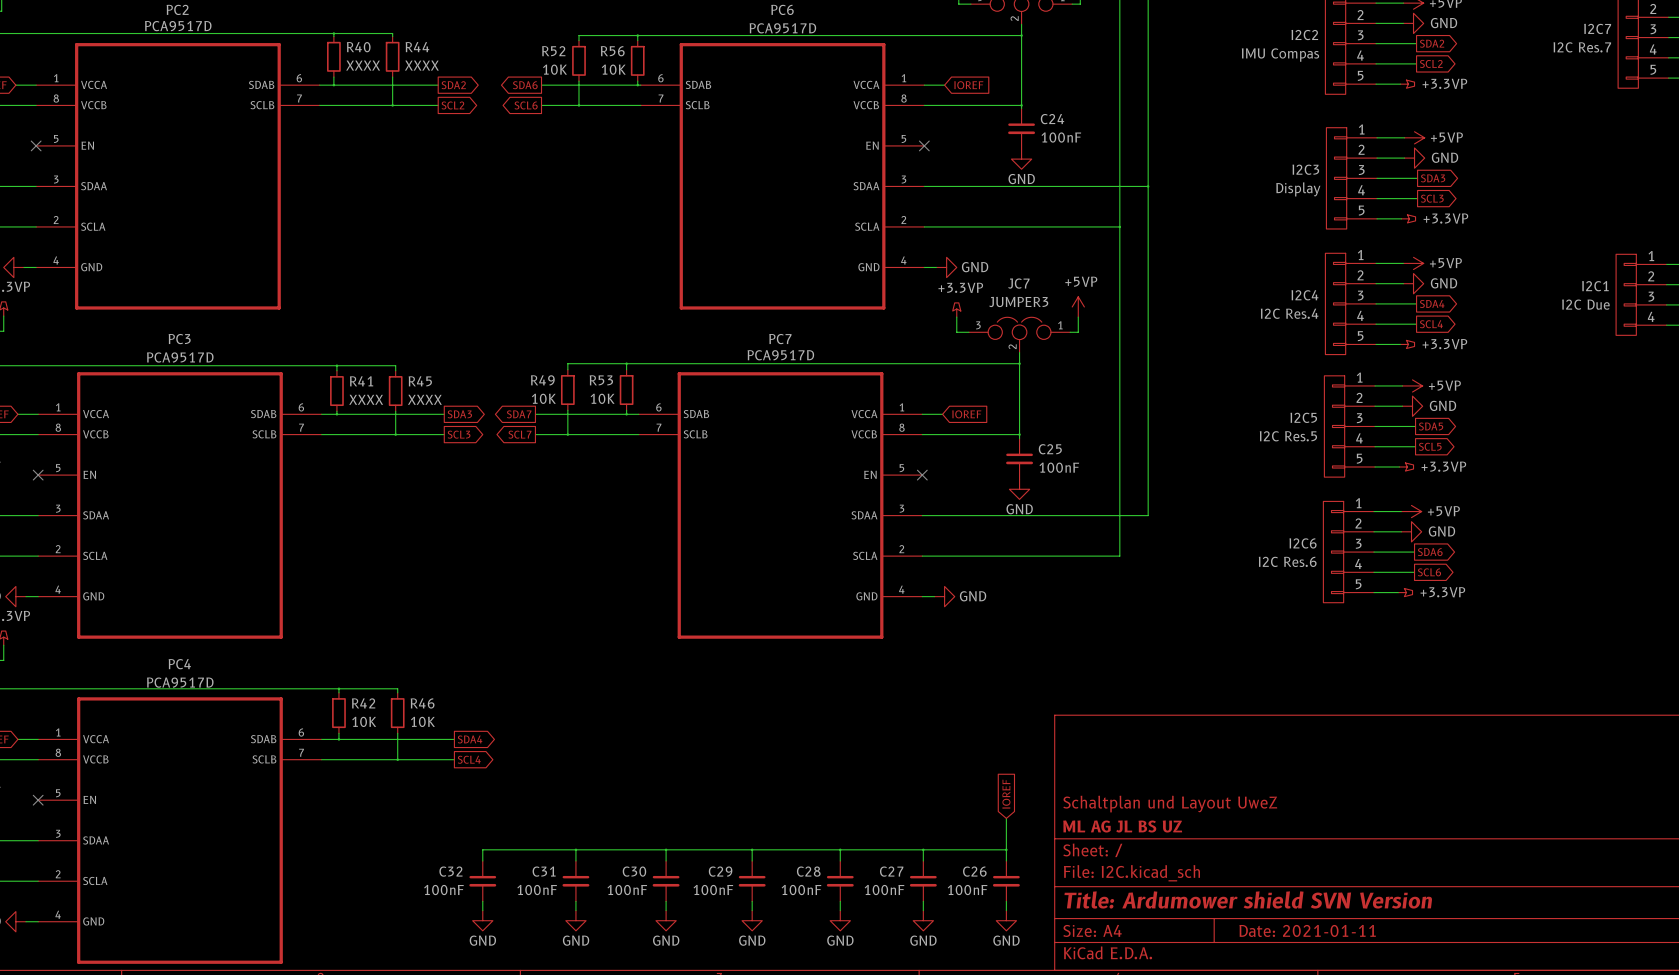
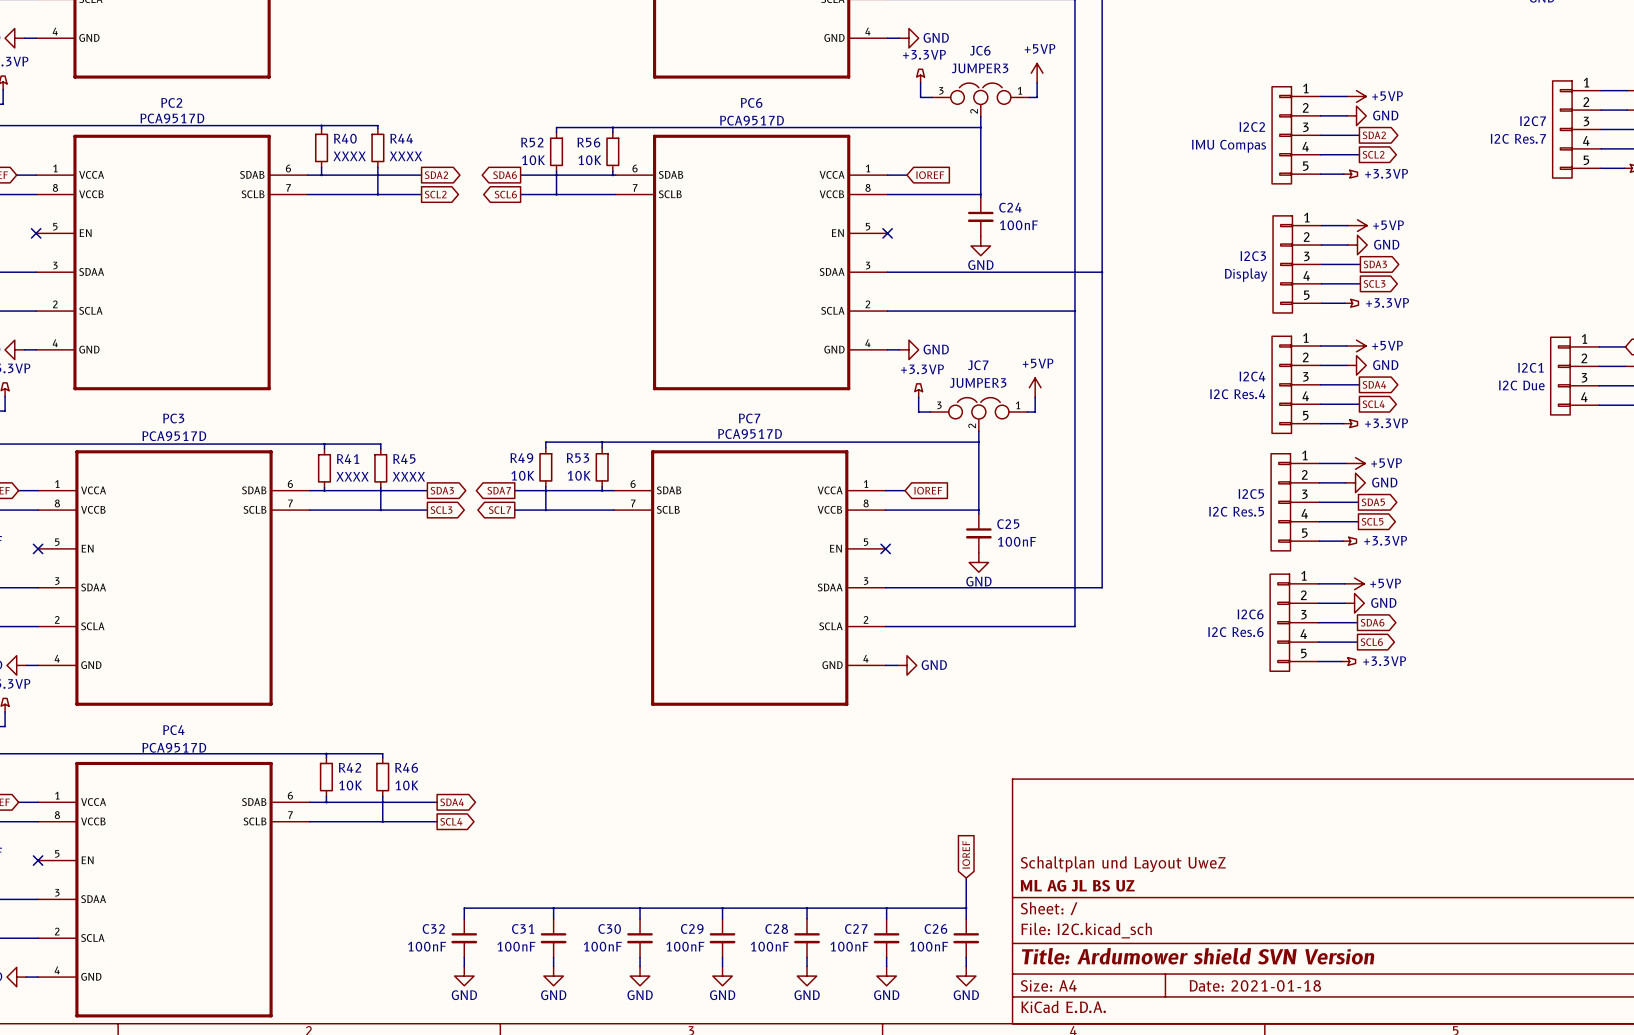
title block: Date: 2021-01-11 (1307, 930) -> Date: 2021-01-18 (1255, 985)

